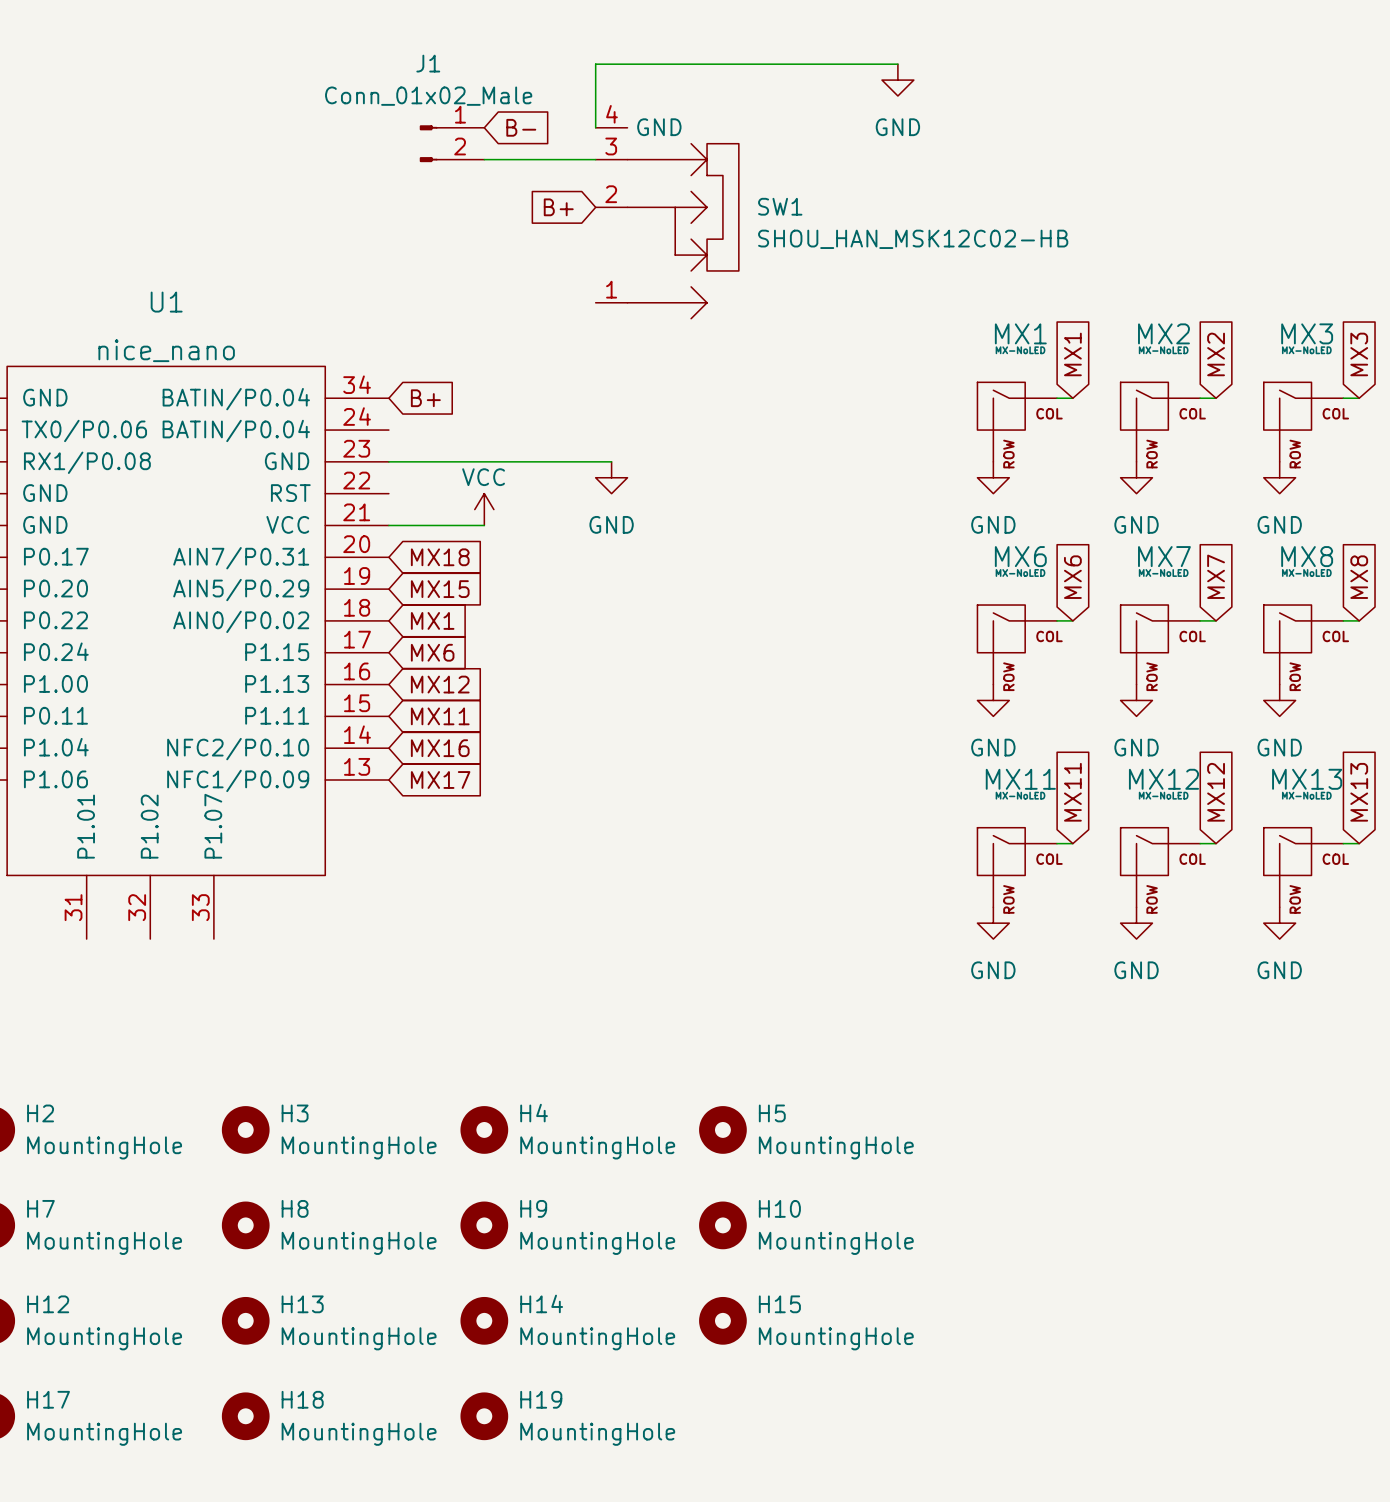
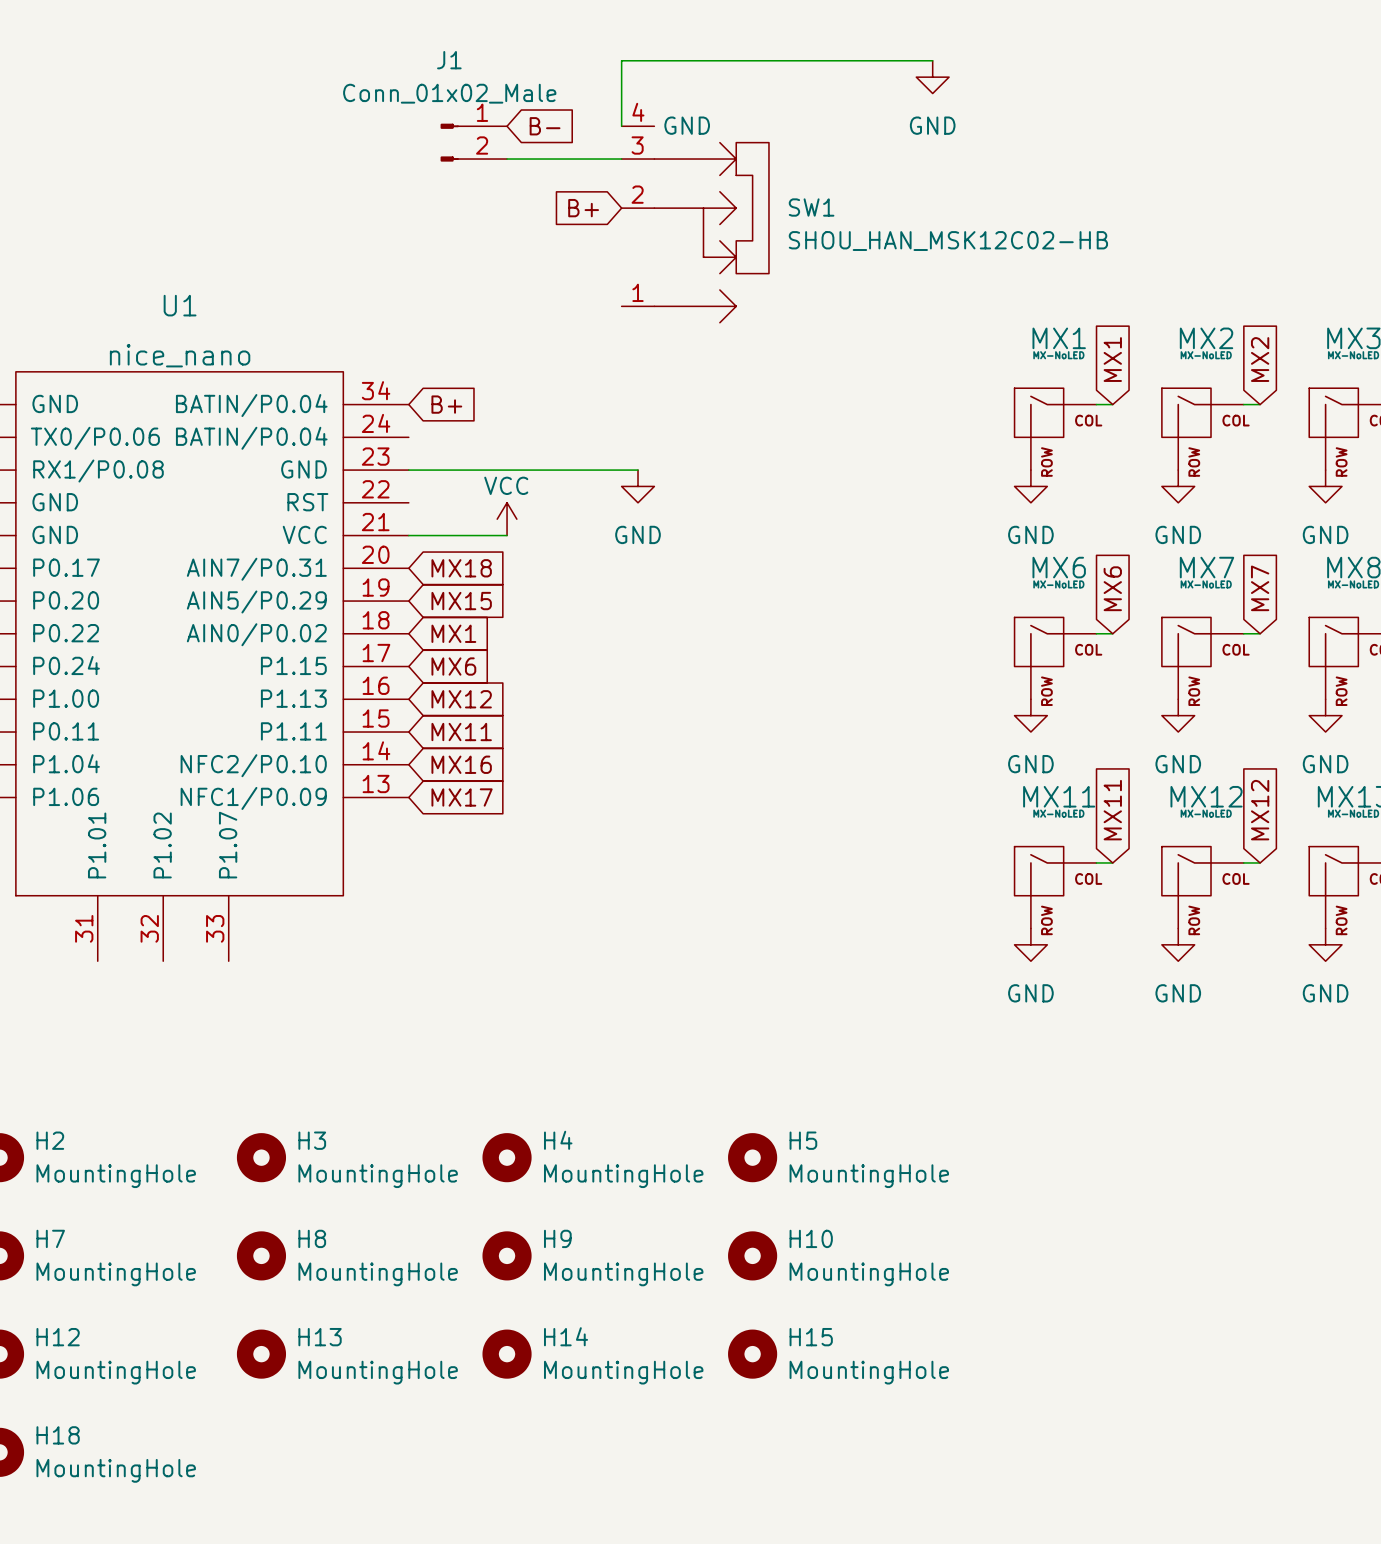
H17 name: H17 (48, 1399) -> H18 (58, 1435)
H18: MountingHole (245, 1416) -> none
H19: MountingHole (484, 1416) -> none

